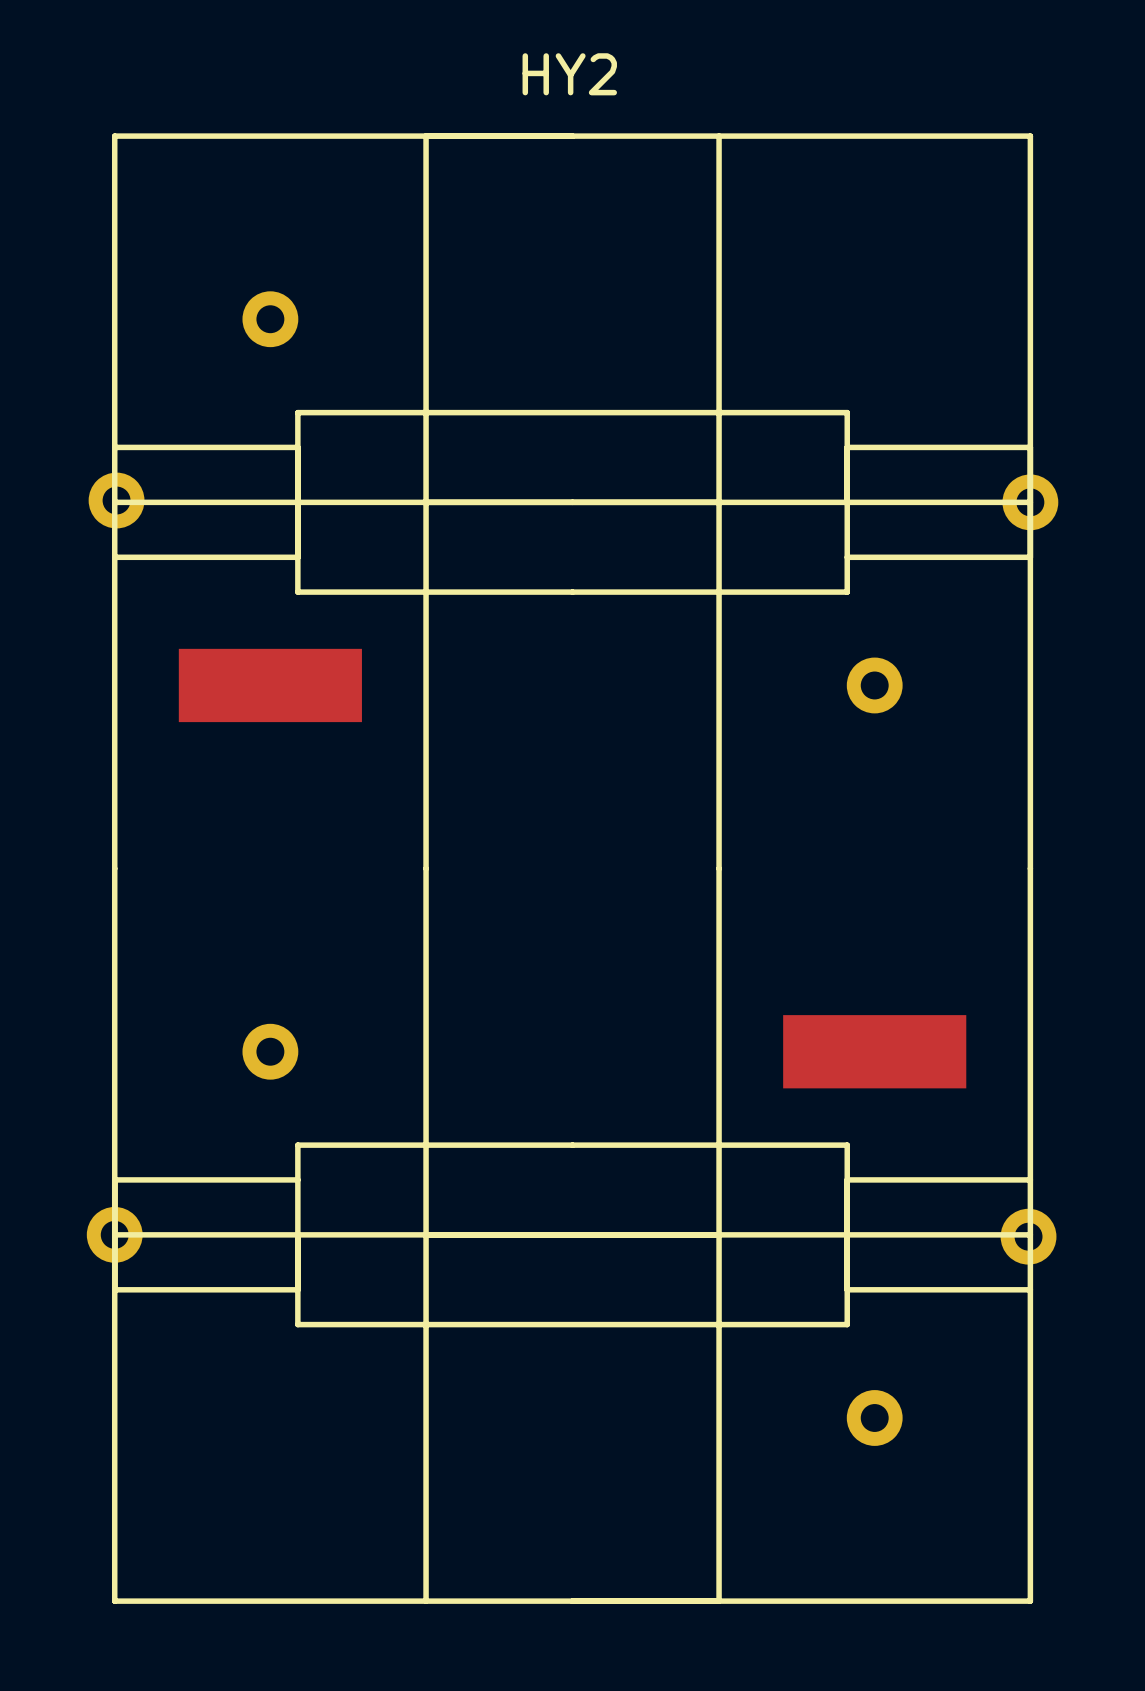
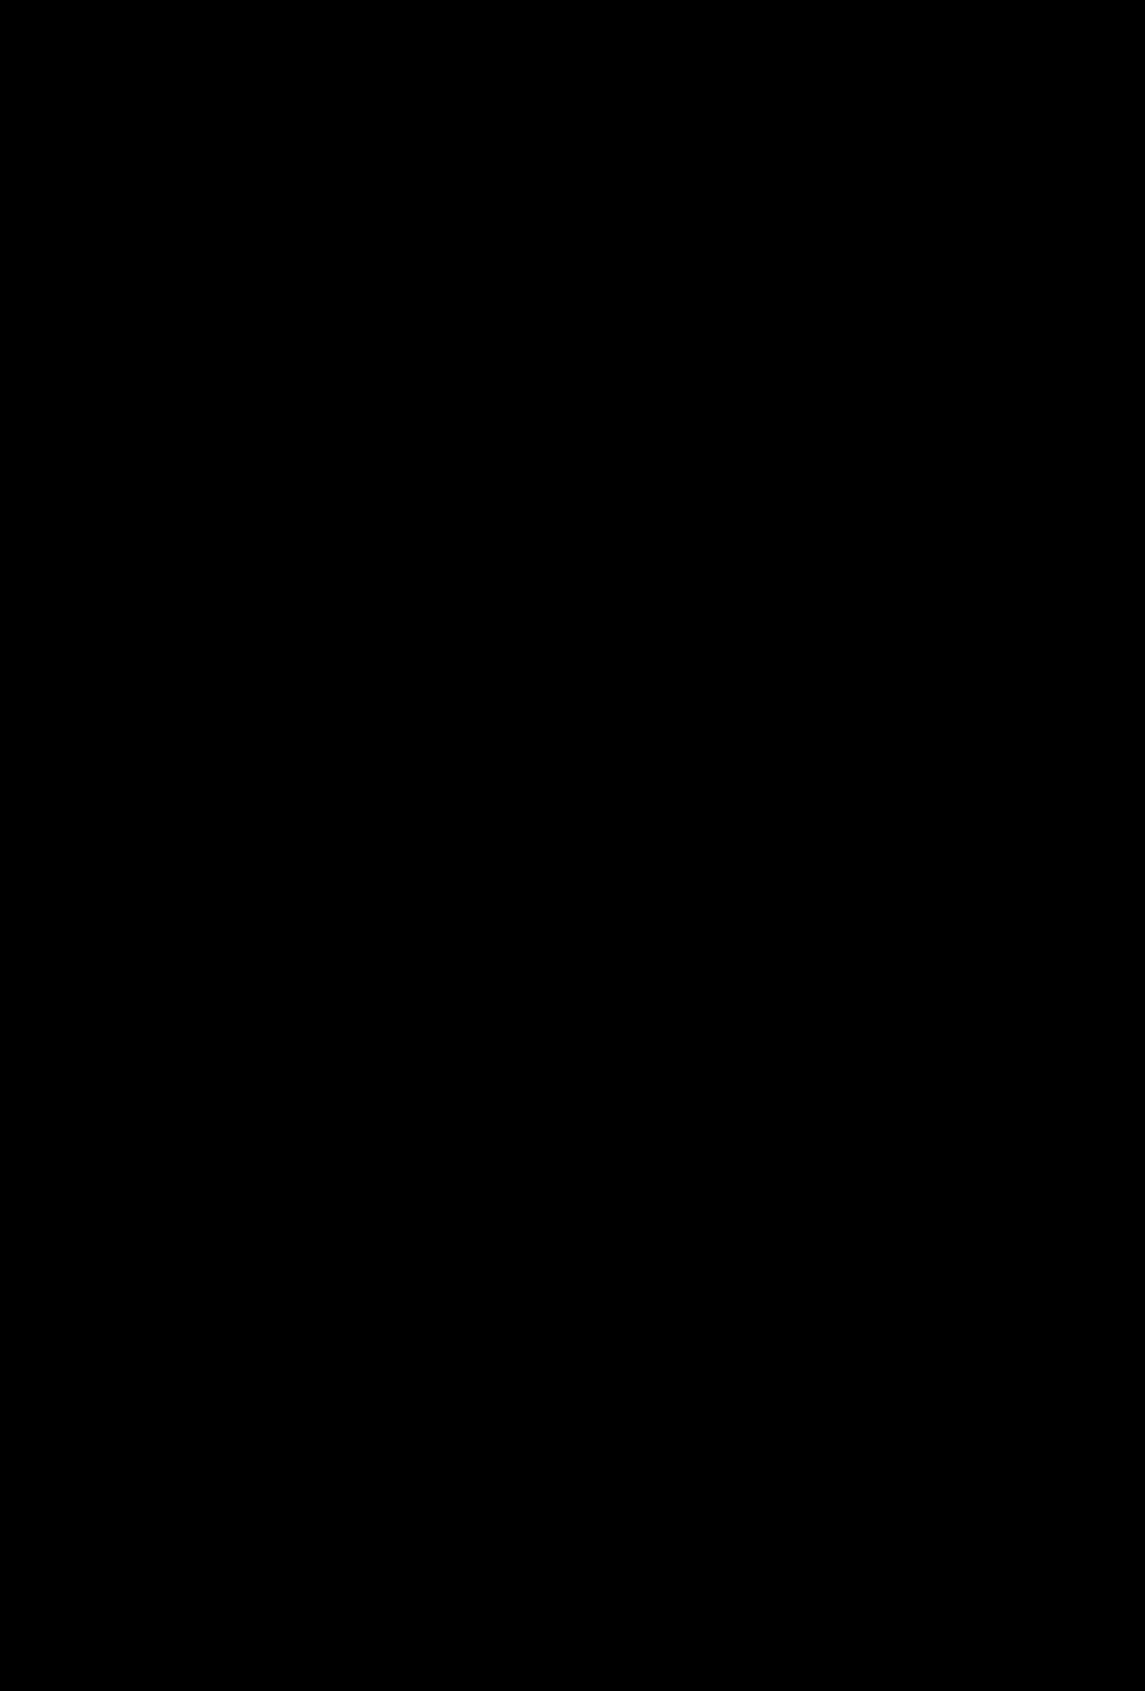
HY2: (572, 868) -> none

